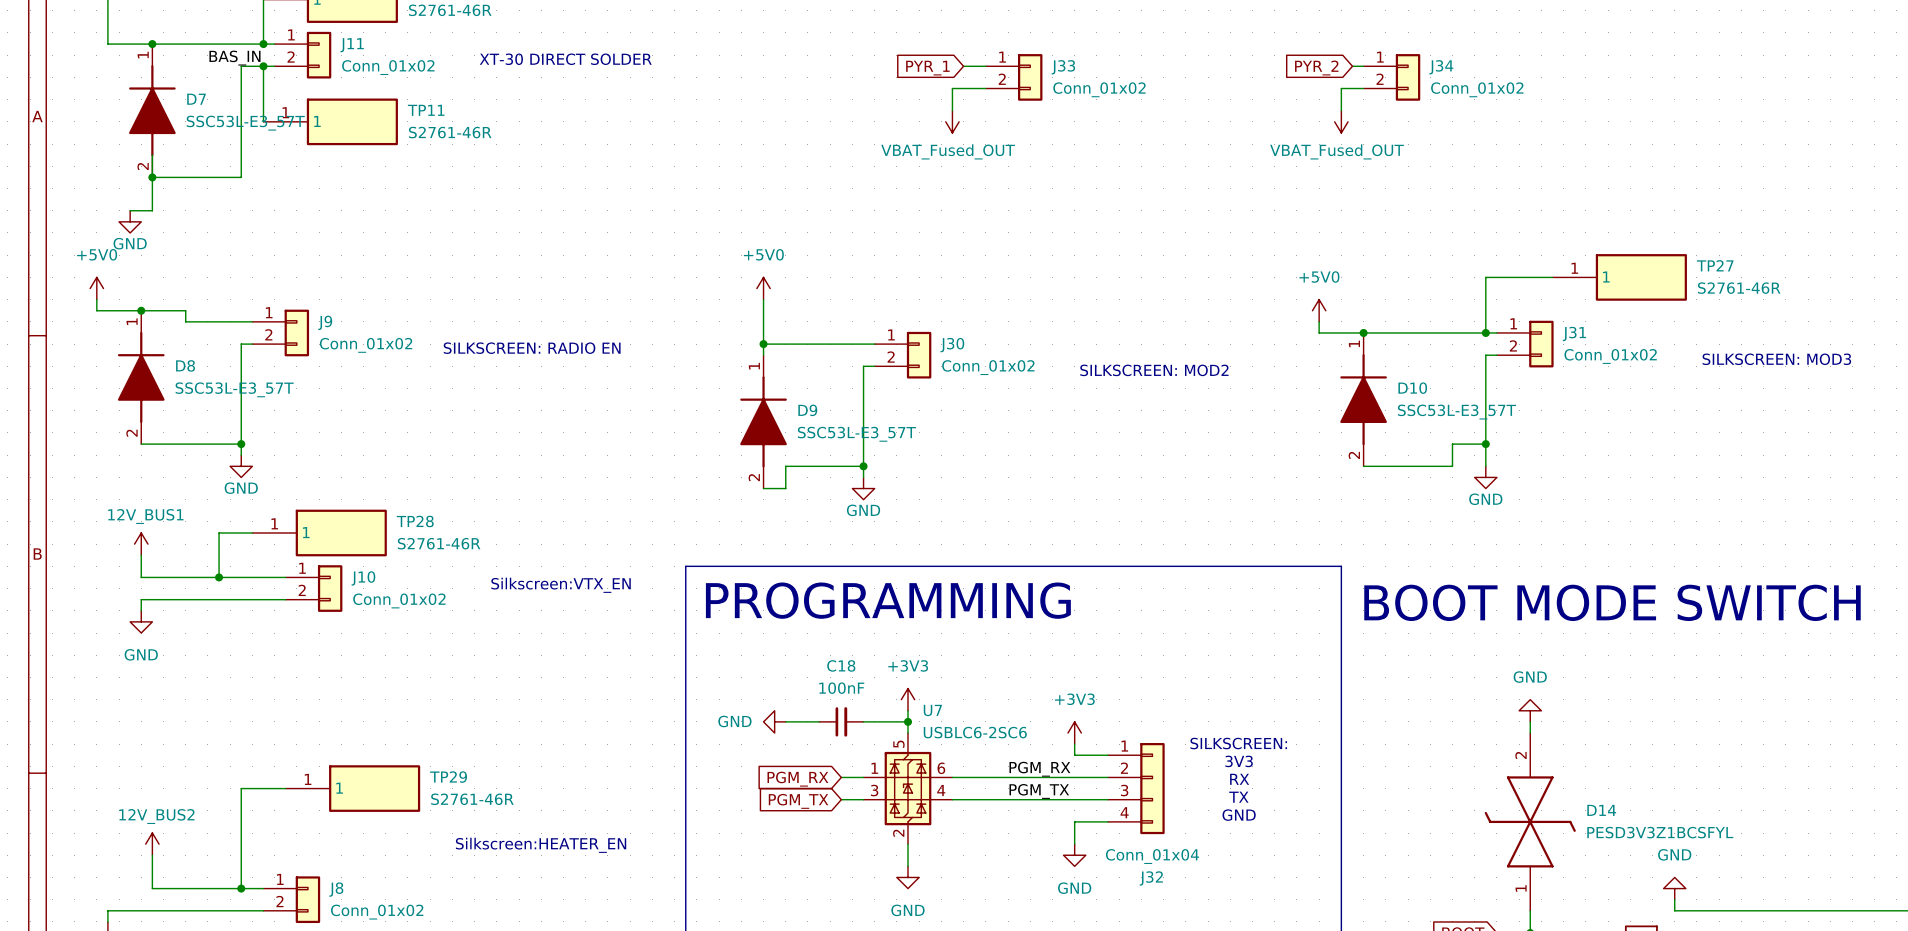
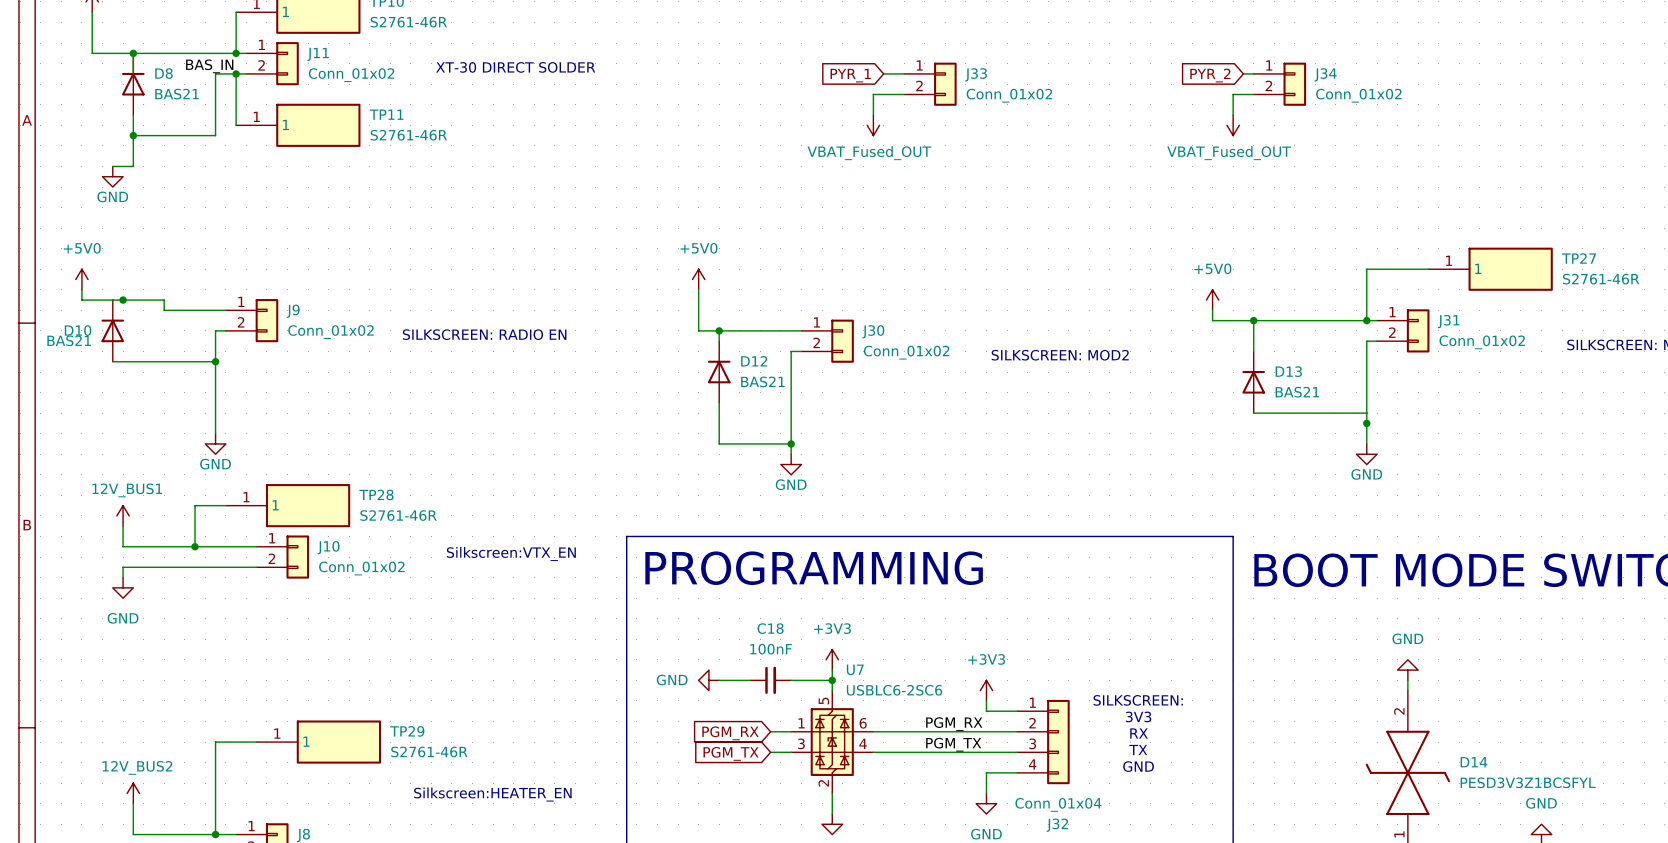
D7: SSC53L-E3_57T (152, 110) -> none
wire: (241, 132) (241, 177) (152, 177) -> (215, 135) (133, 135)
wire: (152, 166) (152, 210) (130, 210) -> (133, 166) (112, 166)
junction position: (152, 177) -> (133, 135)
power symbol position: GND (130, 221) -> GND (112, 176)
D8 symbol: [117, 310, 165, 445] -> [122, 53, 145, 116]
D10 symbol: [1340, 332, 1387, 467] -> [101, 300, 125, 362]
wire: (763, 344) (763, 355) -> (719, 330) (719, 341)
junction position: (763, 344) -> (719, 330)
wire: none -> (112, 361) (215, 361)
junction: none -> (215, 361)
D12: none -> BAS21 (719, 372)
D10 name position: D10 (1412, 388) -> D10 (78, 330)
D8 value: SSC53L-E3_57T (234, 389) -> BAS21 (177, 94)
D13: none -> BAS21 (1253, 382)
D10 value: SSC53L-E3_57T (1456, 412) -> BAS21 (69, 340)
D9: SSC53L-E3_57T (763, 421) -> none
wire: none -> (1253, 413) (1366, 413)
wire: (141, 444) (241, 444) -> none
junction: (241, 444) -> none
wire: (1485, 444) (1452, 444) (1452, 466) (1363, 466) -> none
wire: (785, 466) (785, 488) (763, 488) -> (719, 443) (719, 402)

